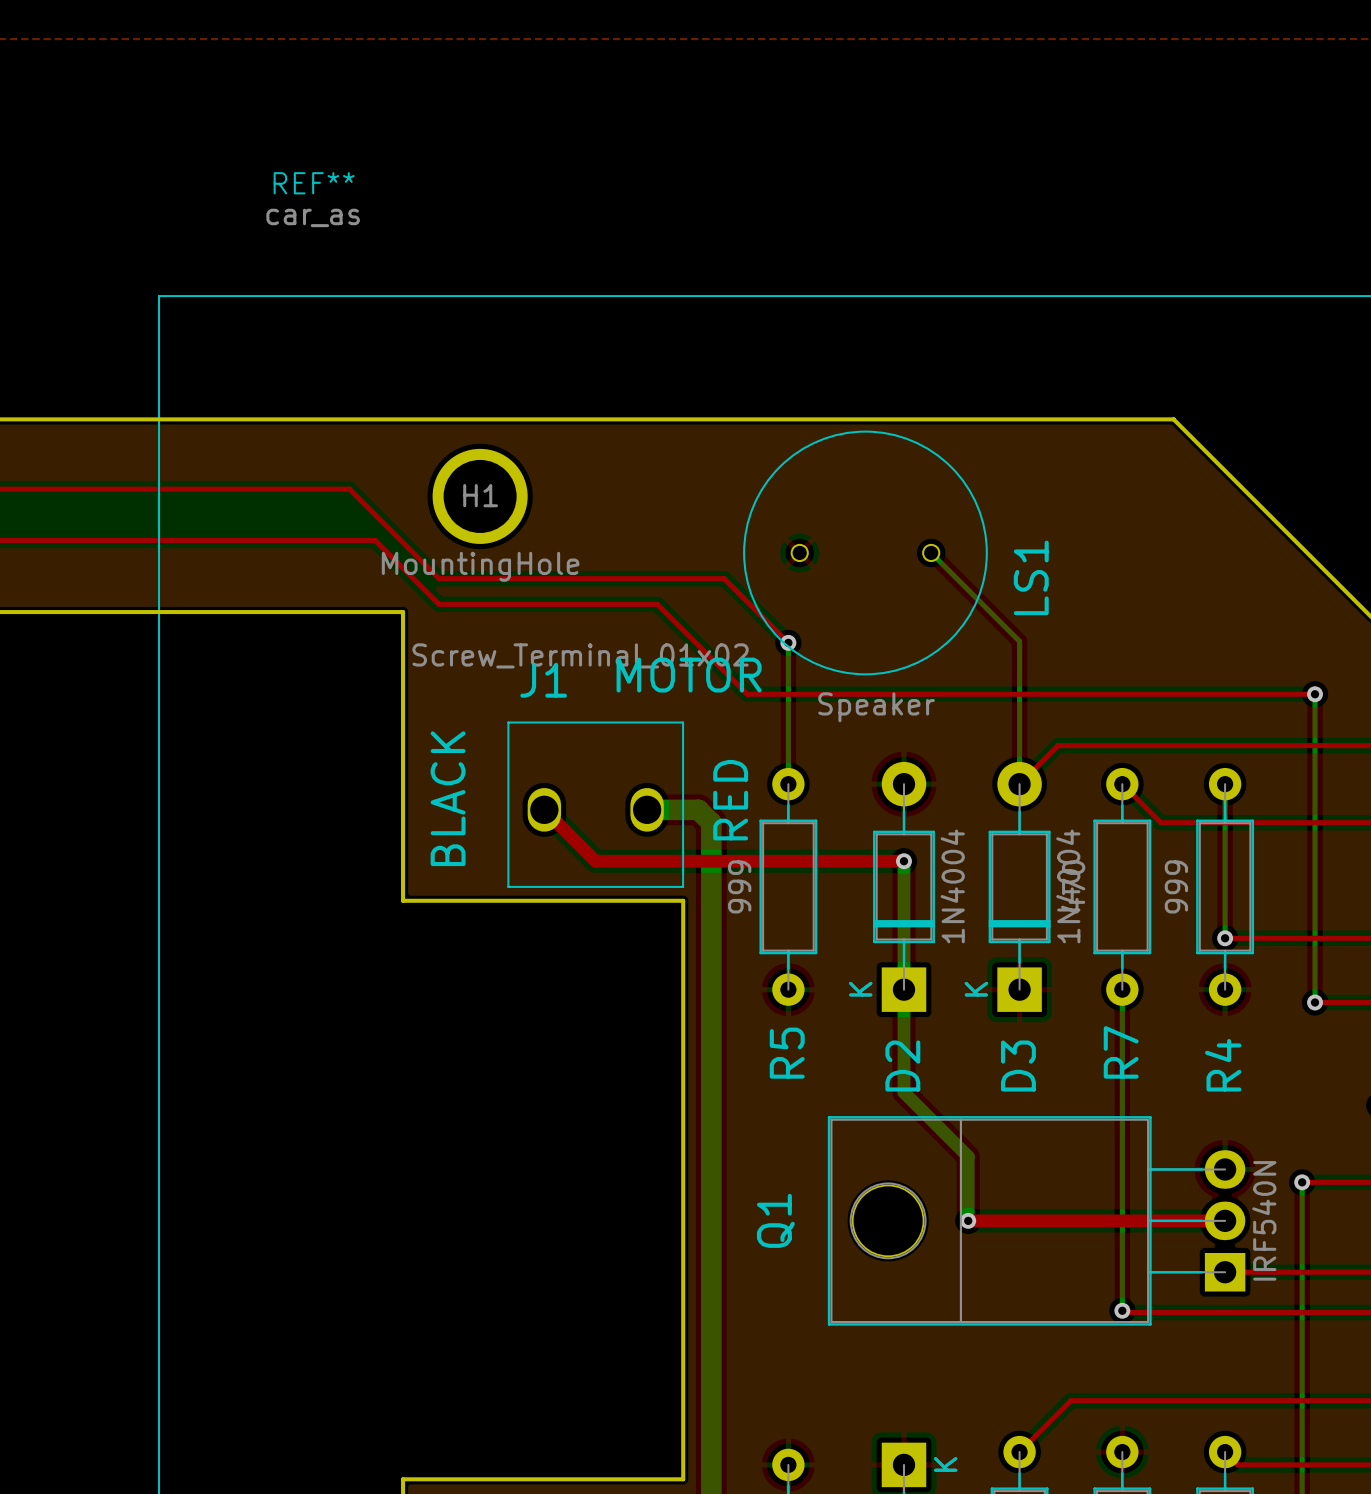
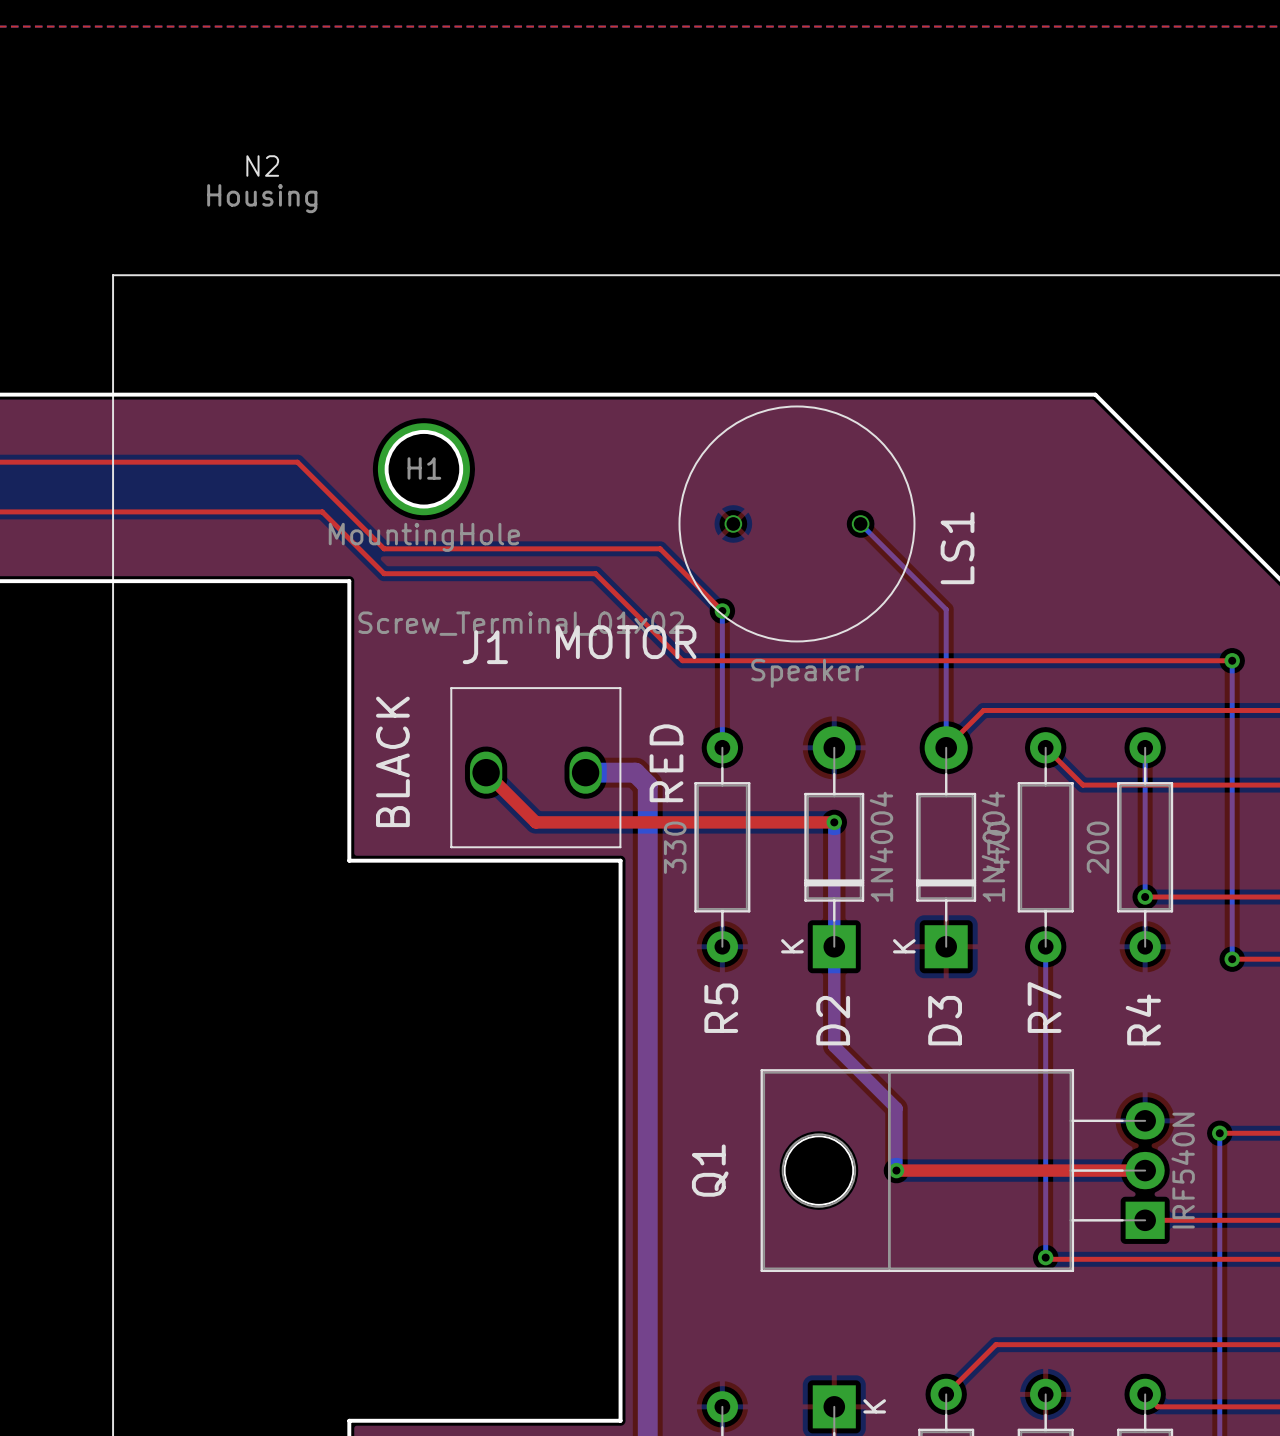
REF** name: REF** (314, 183) -> N2 (262, 166)
REF** value: car_as (313, 217) -> Housing (262, 198)
R5 value: 999 (739, 886) -> 330 (675, 847)
R4 value: 999 (1176, 886) -> 200 (1098, 847)

